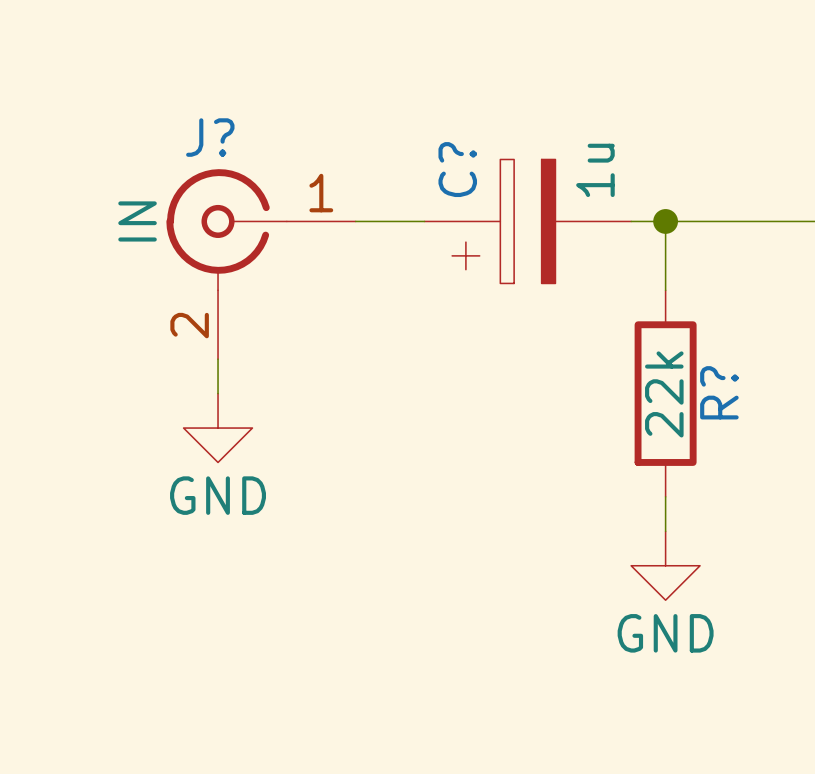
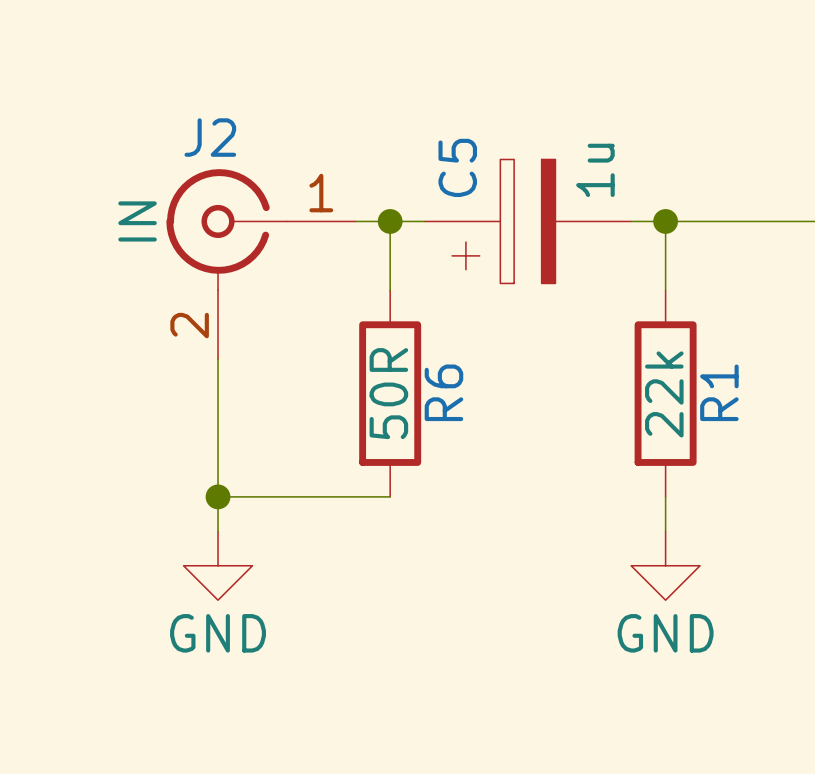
J? name: J? (210, 137) -> J2 (210, 137)
C? name: C? (457, 169) -> C5 (457, 167)
wire: none -> (390, 221) (390, 290)
junction: none -> (390, 221)
R? name: R? (719, 392) -> R1 (719, 392)
wire: none -> (218, 393) (218, 531)
R6: none -> 50R (390, 393)
power symbol position: GND (218, 428) -> GND (218, 565)
wire: none -> (218, 496) (390, 496)
junction: none -> (218, 496)

